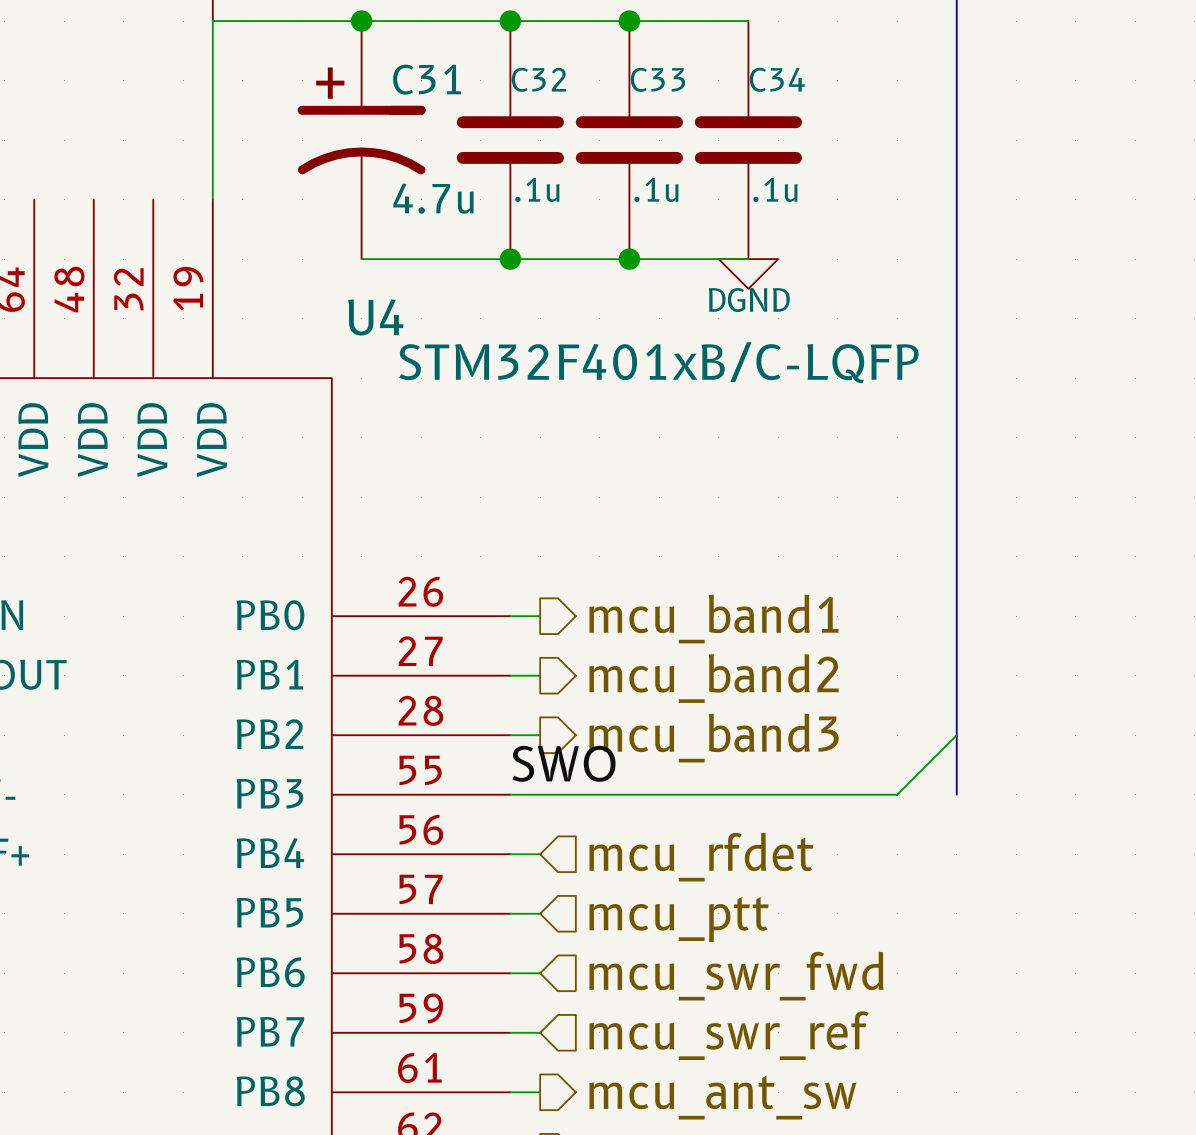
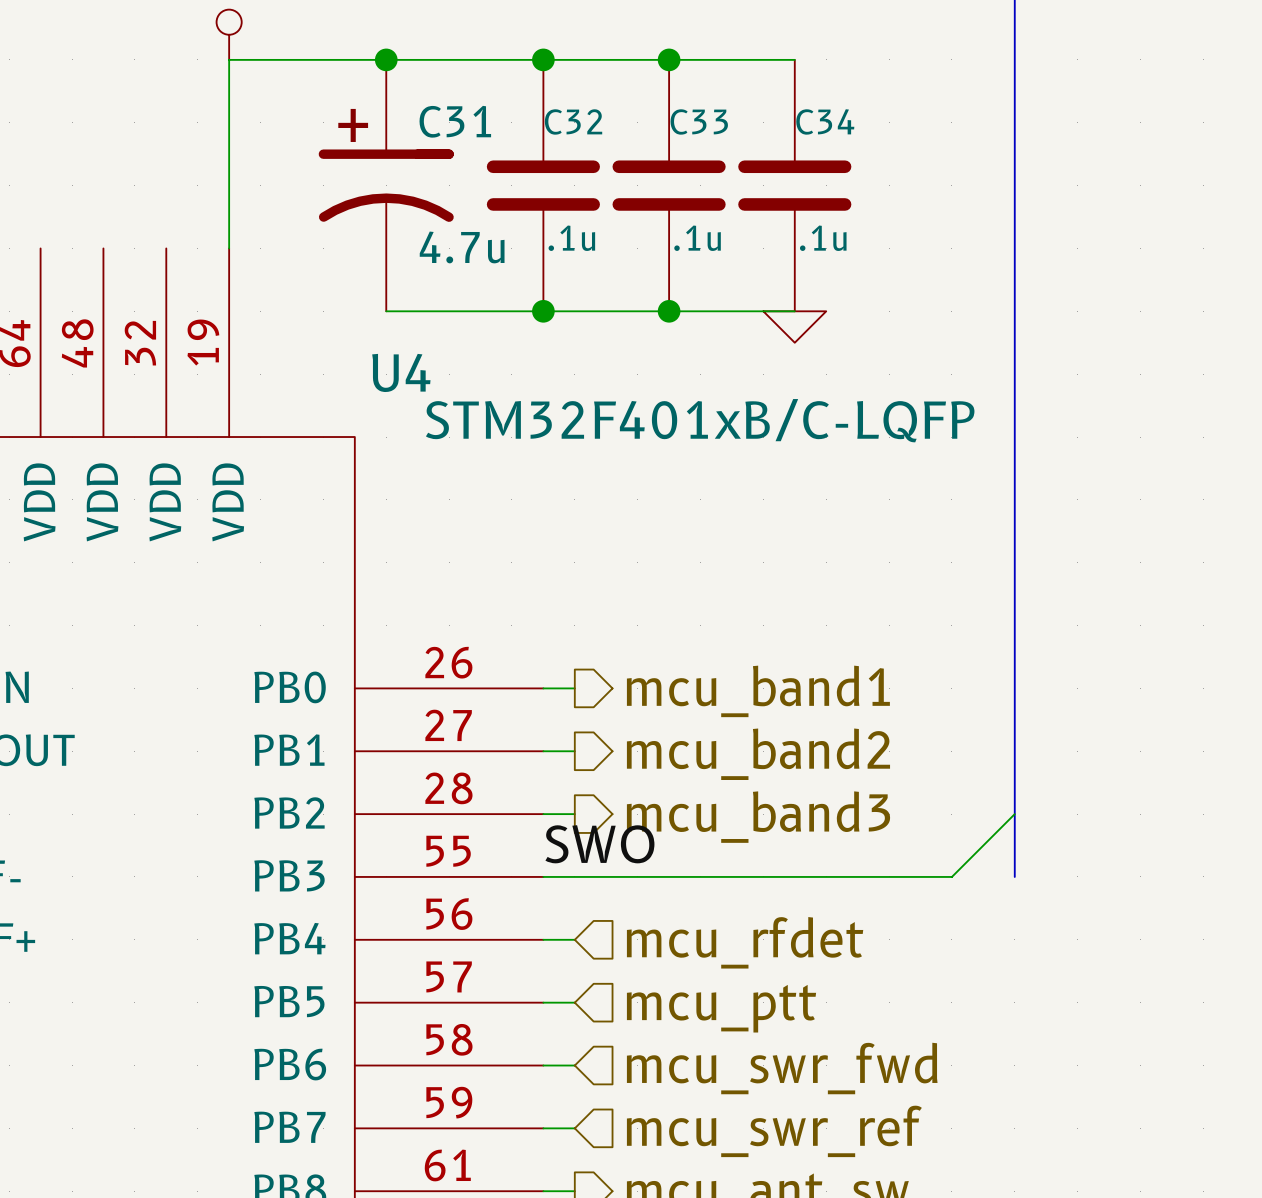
power symbol text: DGND (749, 300) -> none

